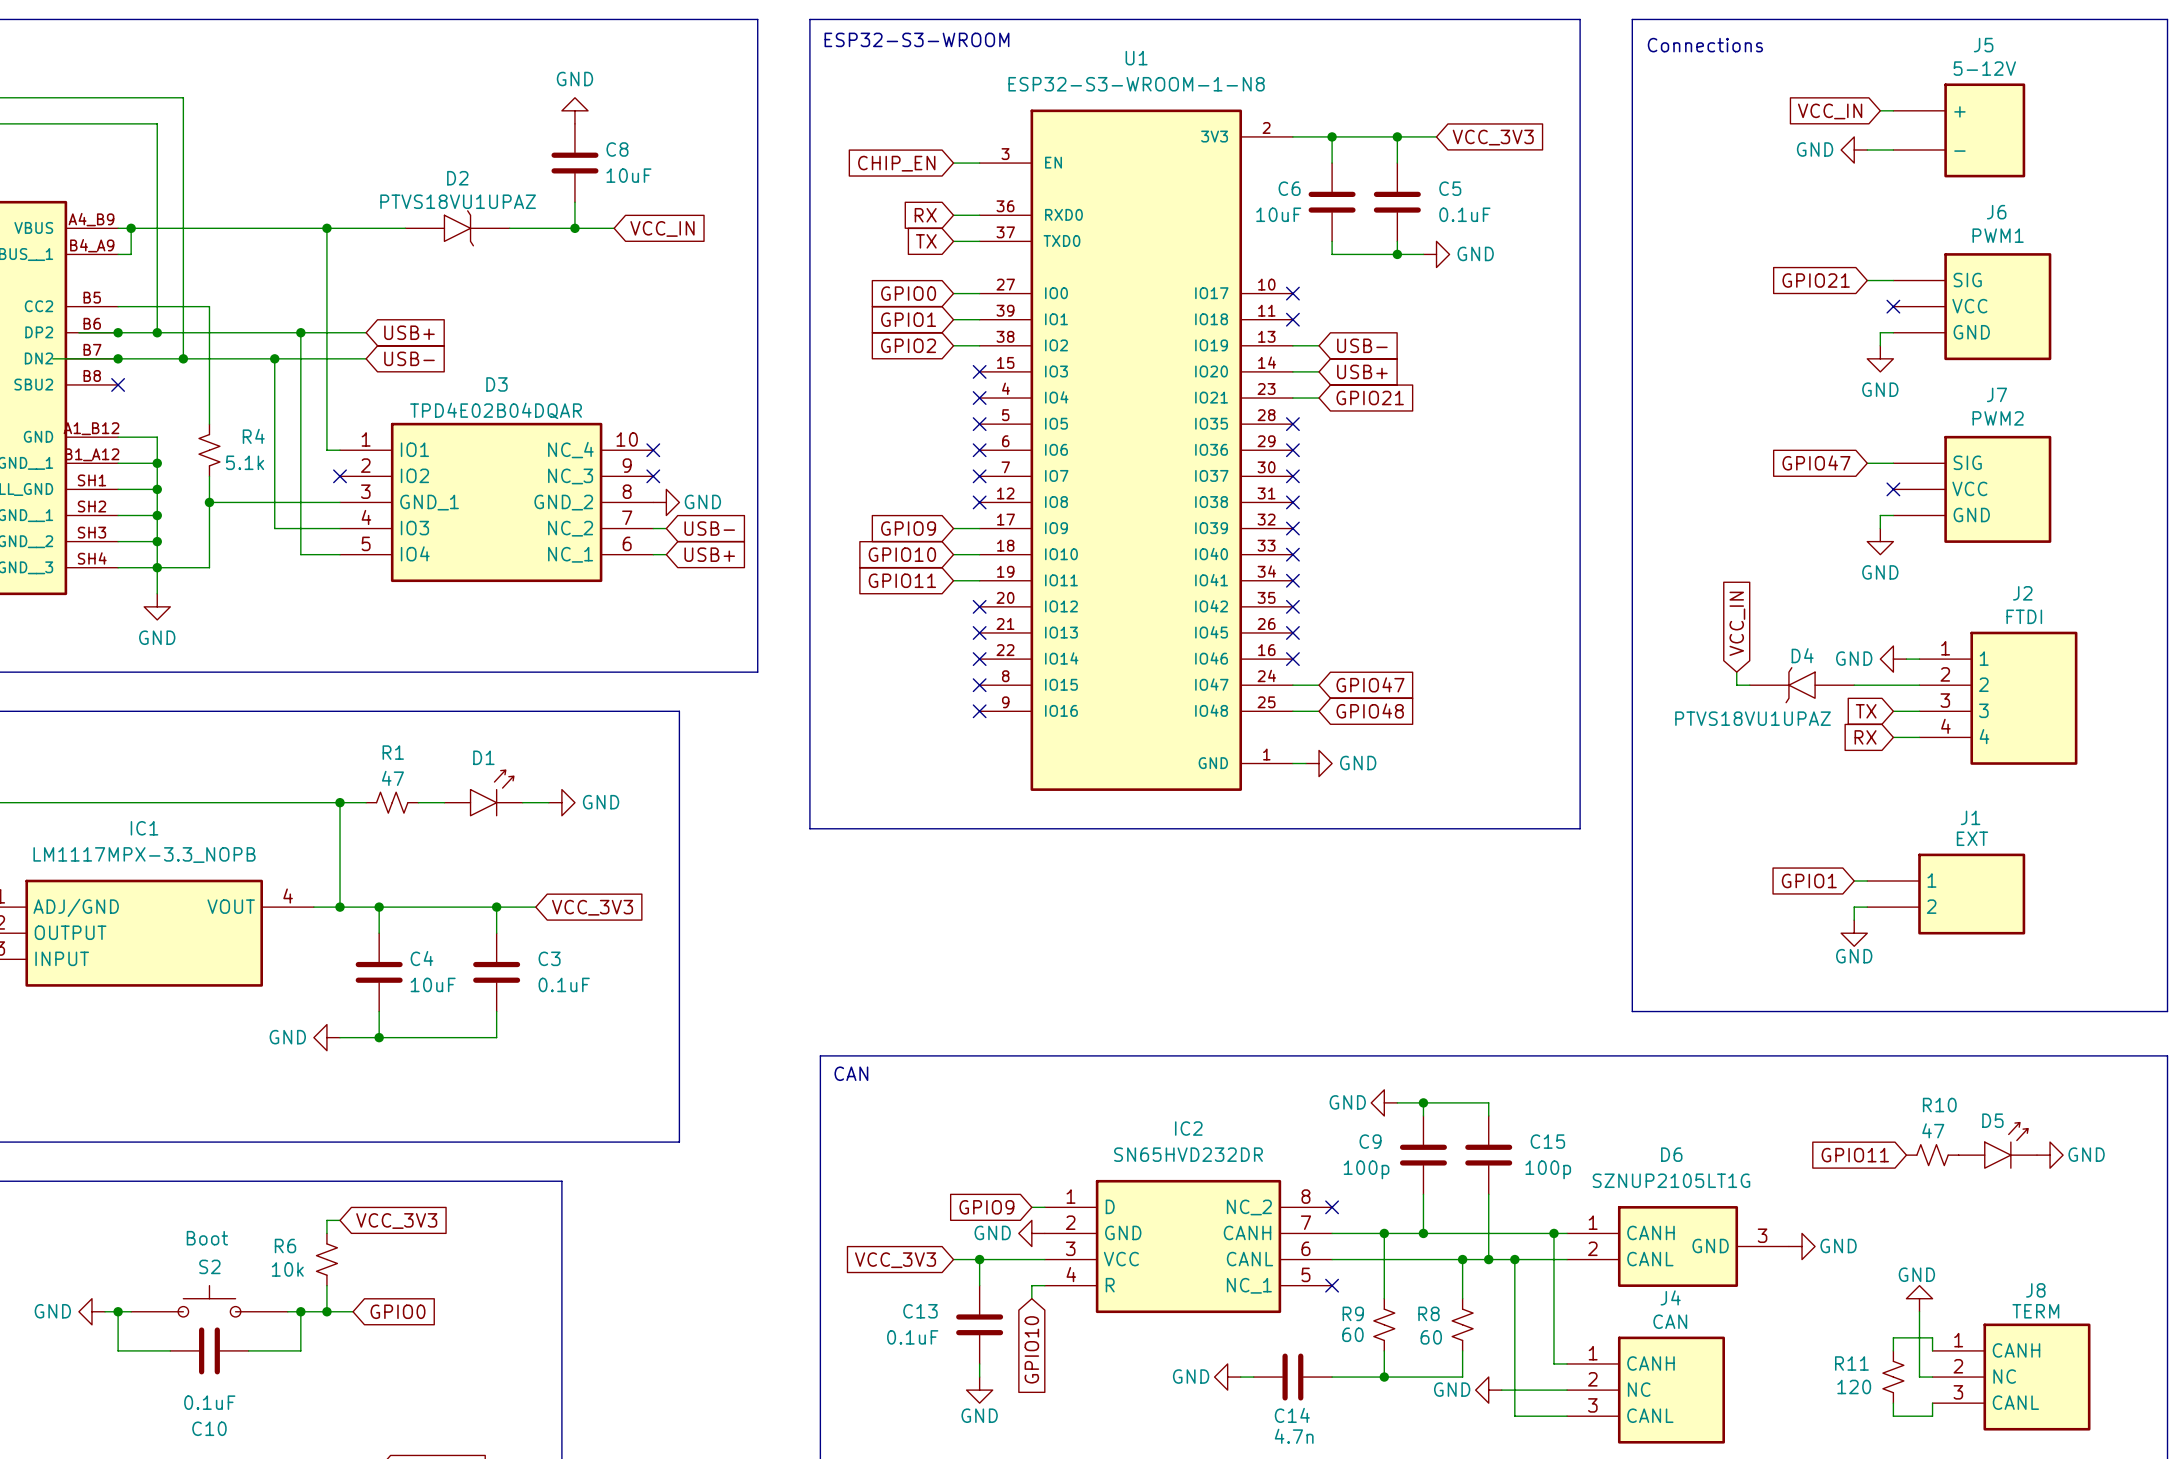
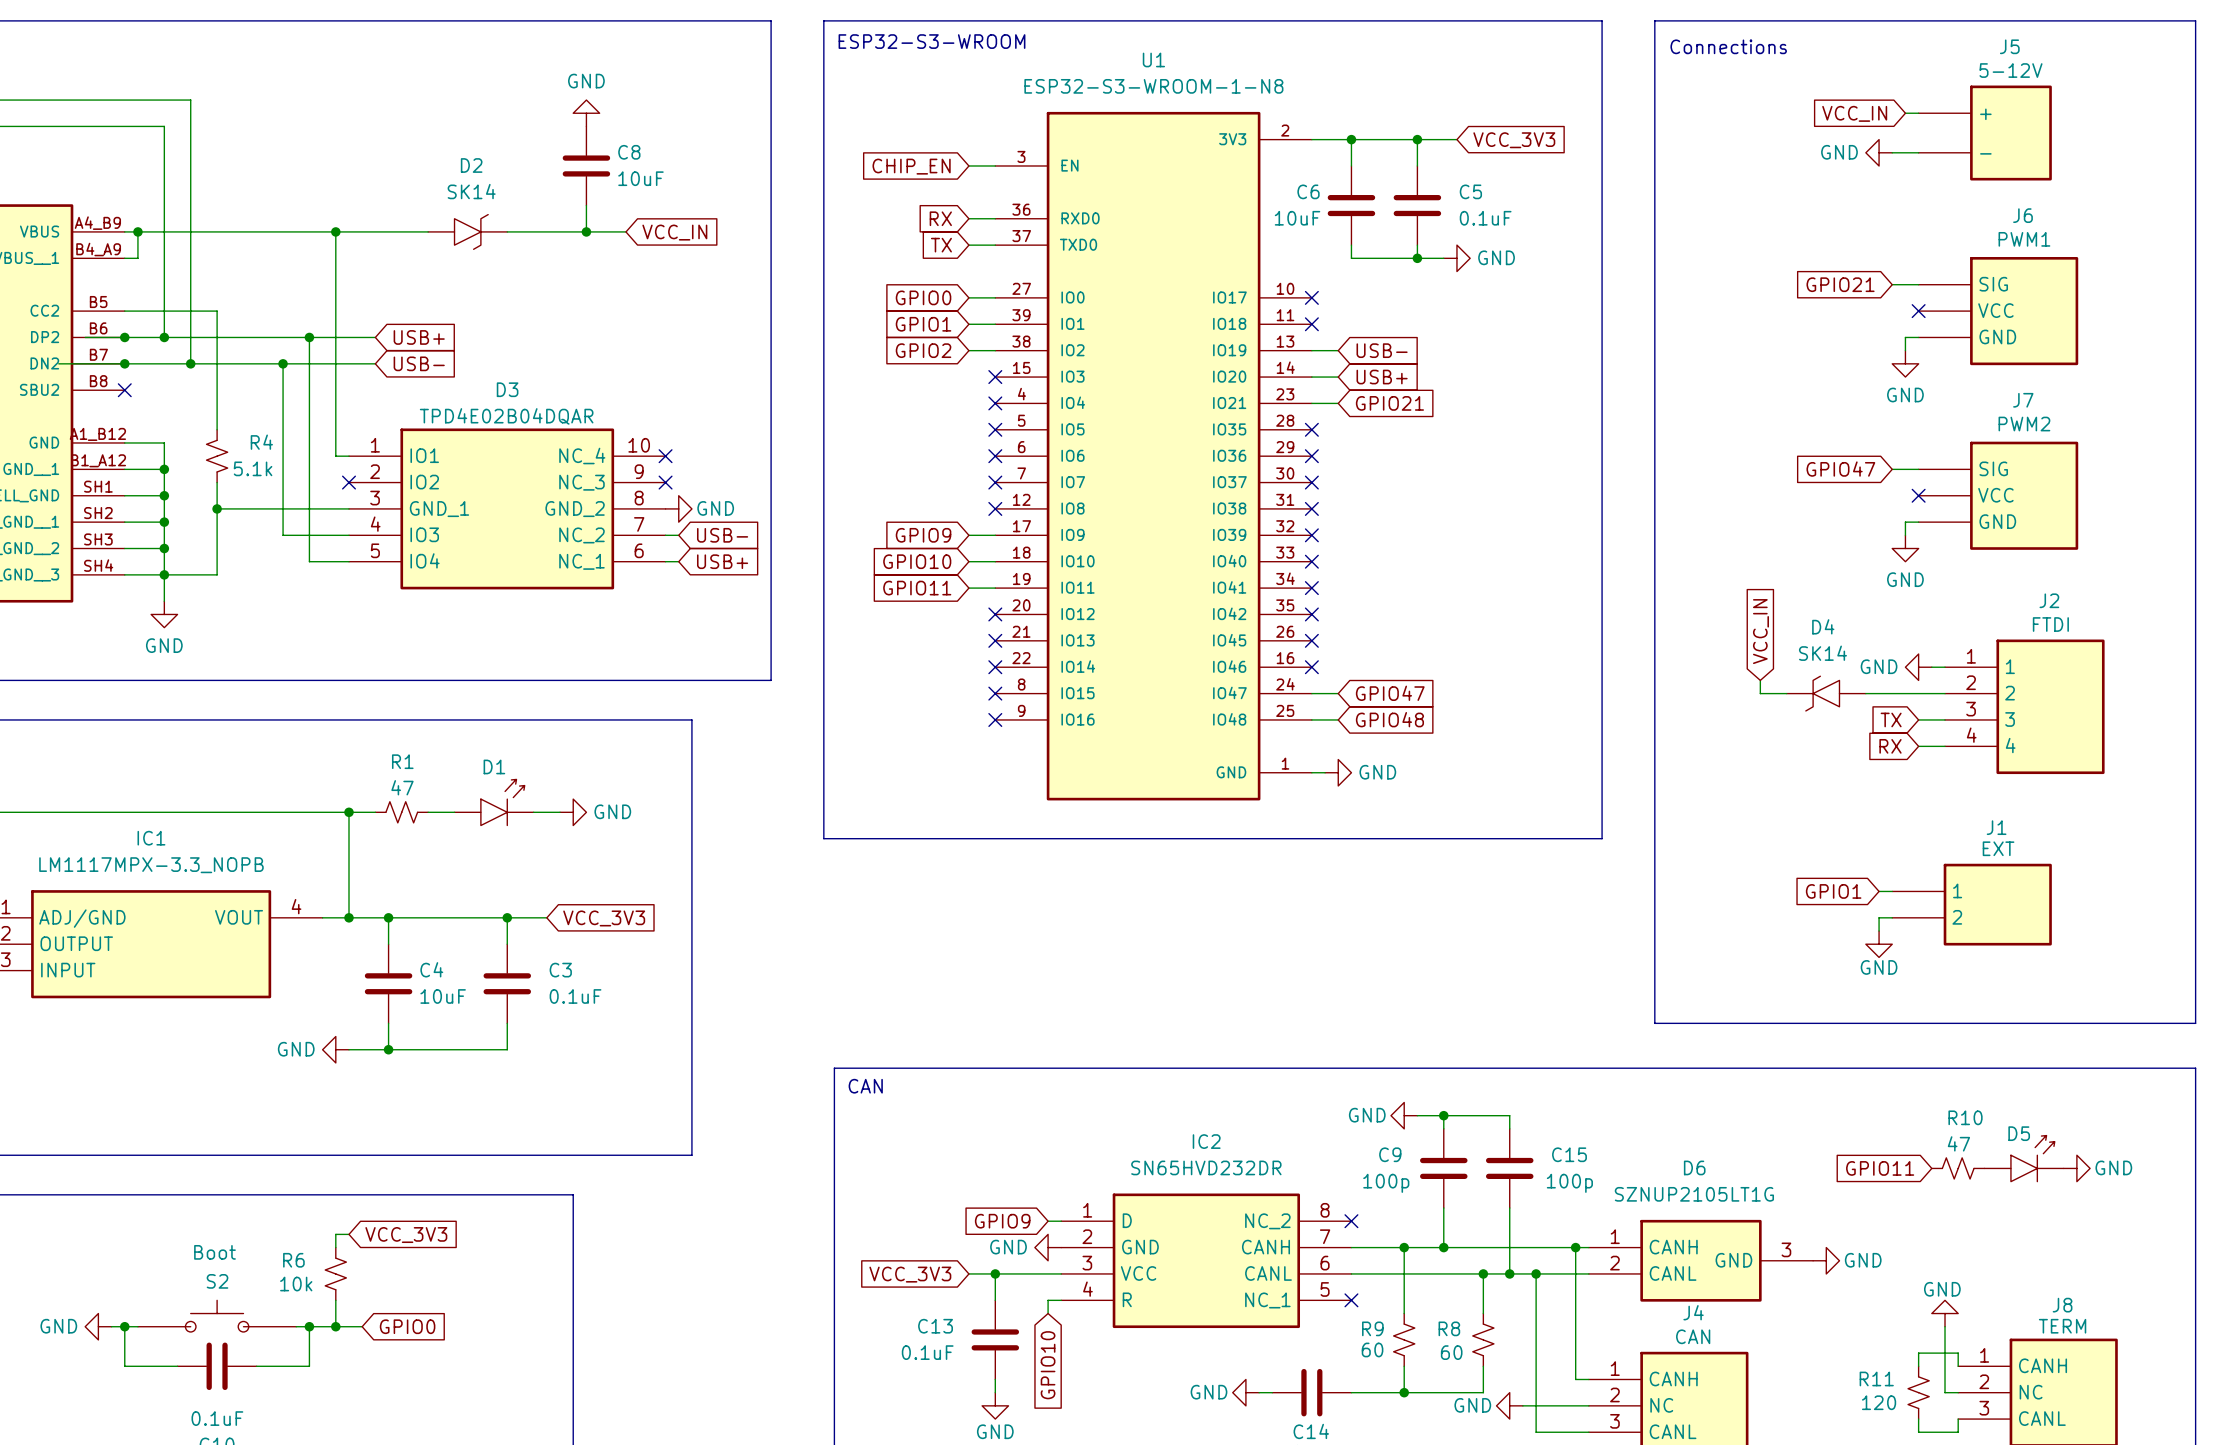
D2 value: PTVS18VU1UPAZ (458, 201) -> SK14 (471, 191)
D2 symbol: [405, 210, 510, 246] -> [428, 214, 508, 250]
D4 name position: D4 (1802, 655) -> D4 (1823, 626)
D4 symbol: [1749, 667, 1855, 703] -> [1786, 676, 1866, 711]
D4 value: PTVS18VU1UPAZ (1753, 718) -> SK14 (1822, 653)

